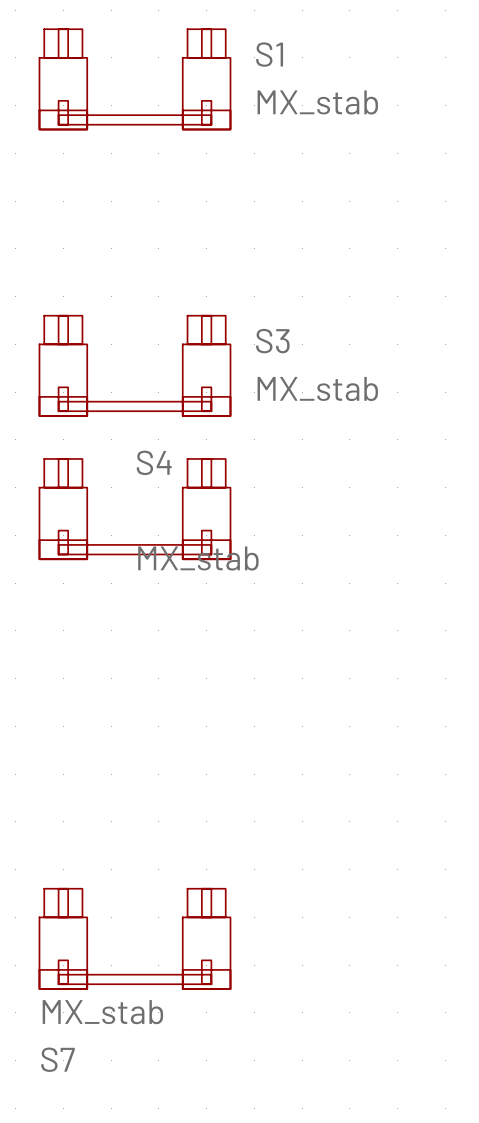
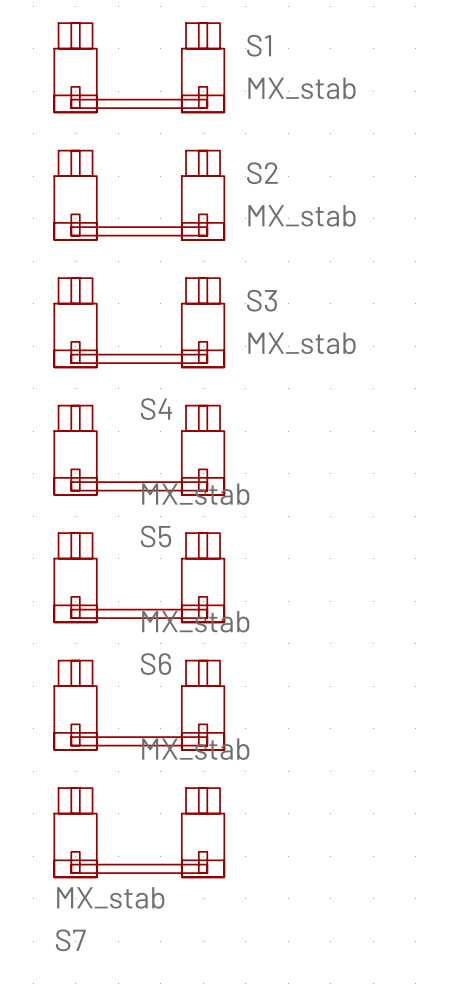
S2: none -> MX_stab (139, 195)
S5: none -> MX_stab (139, 577)
S6: none -> MX_stab (139, 705)

